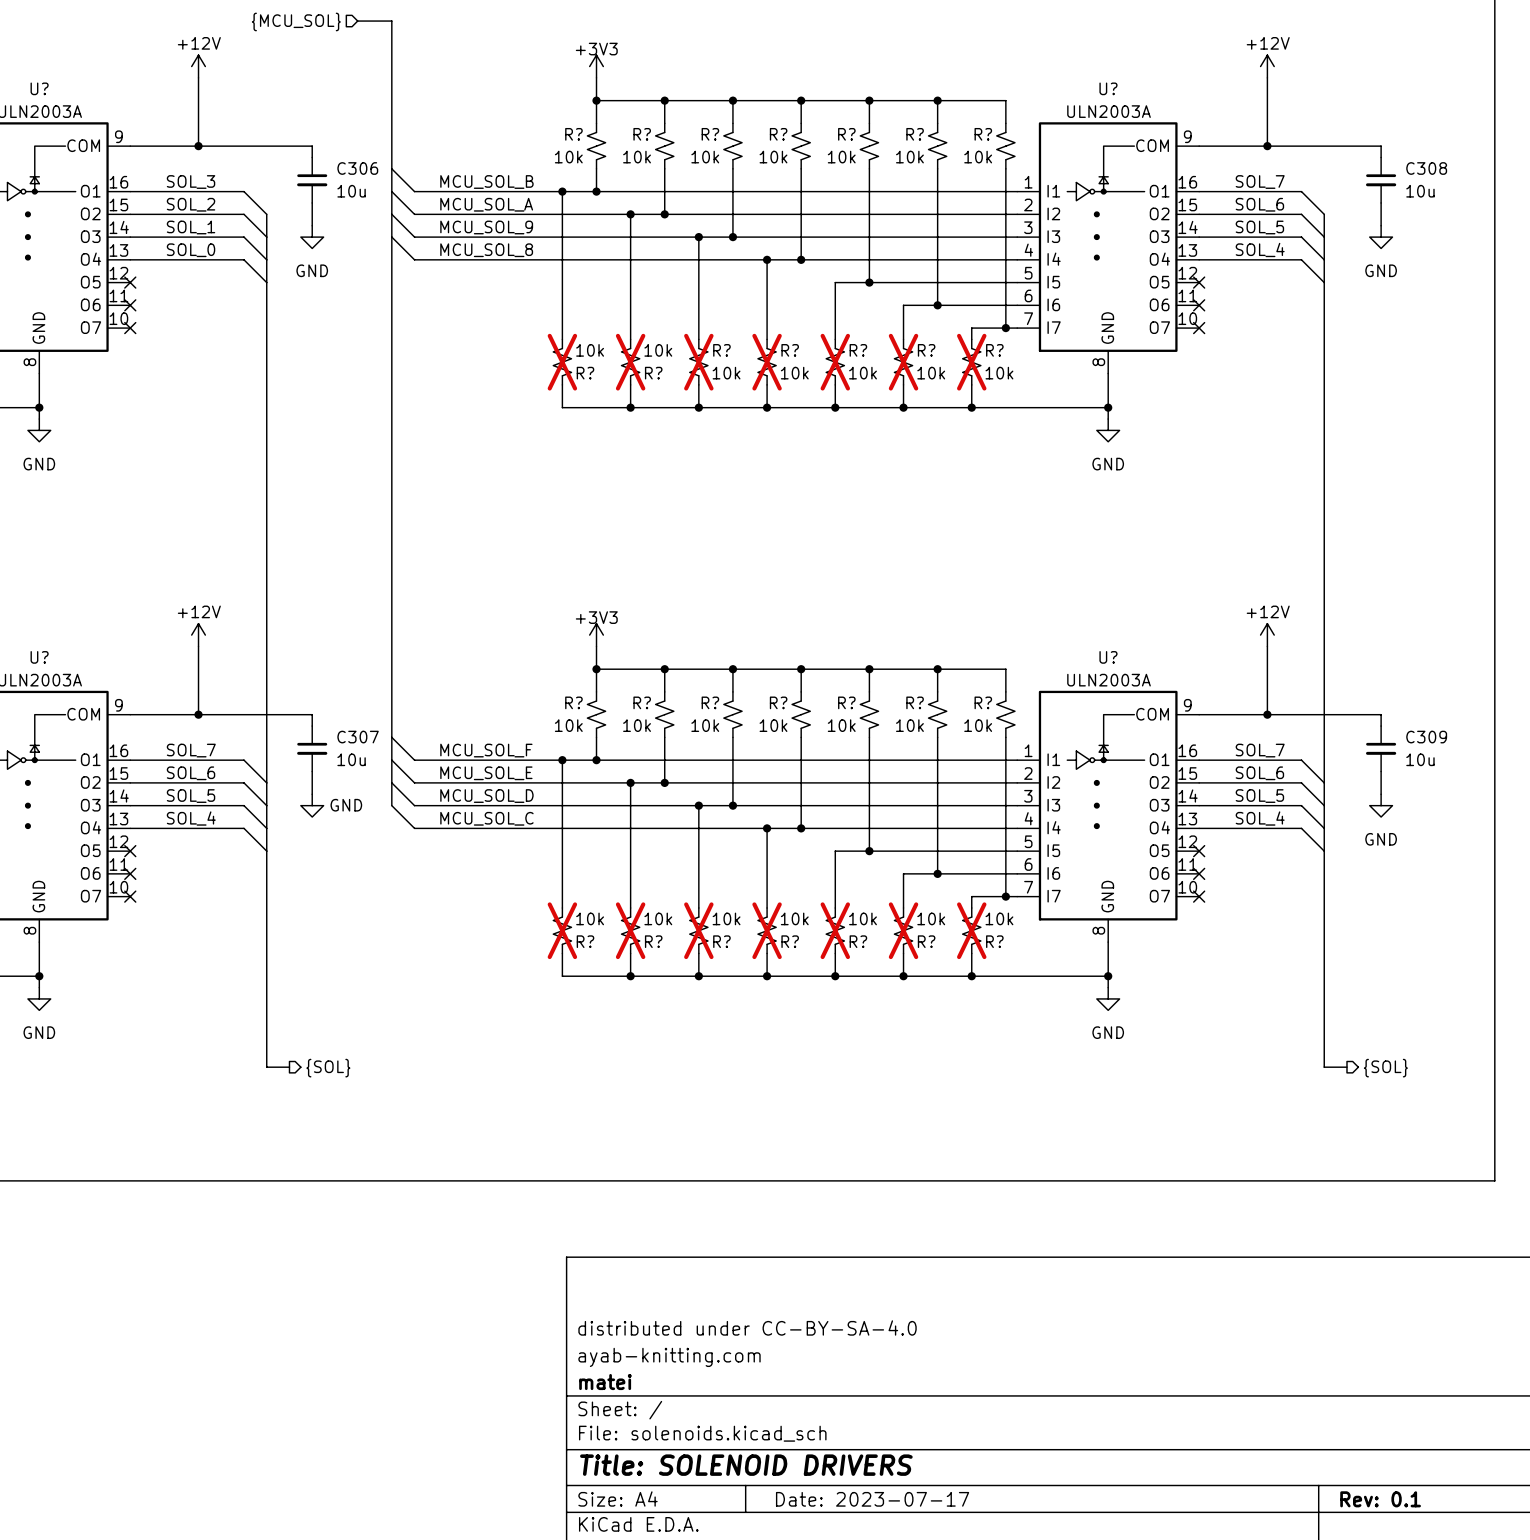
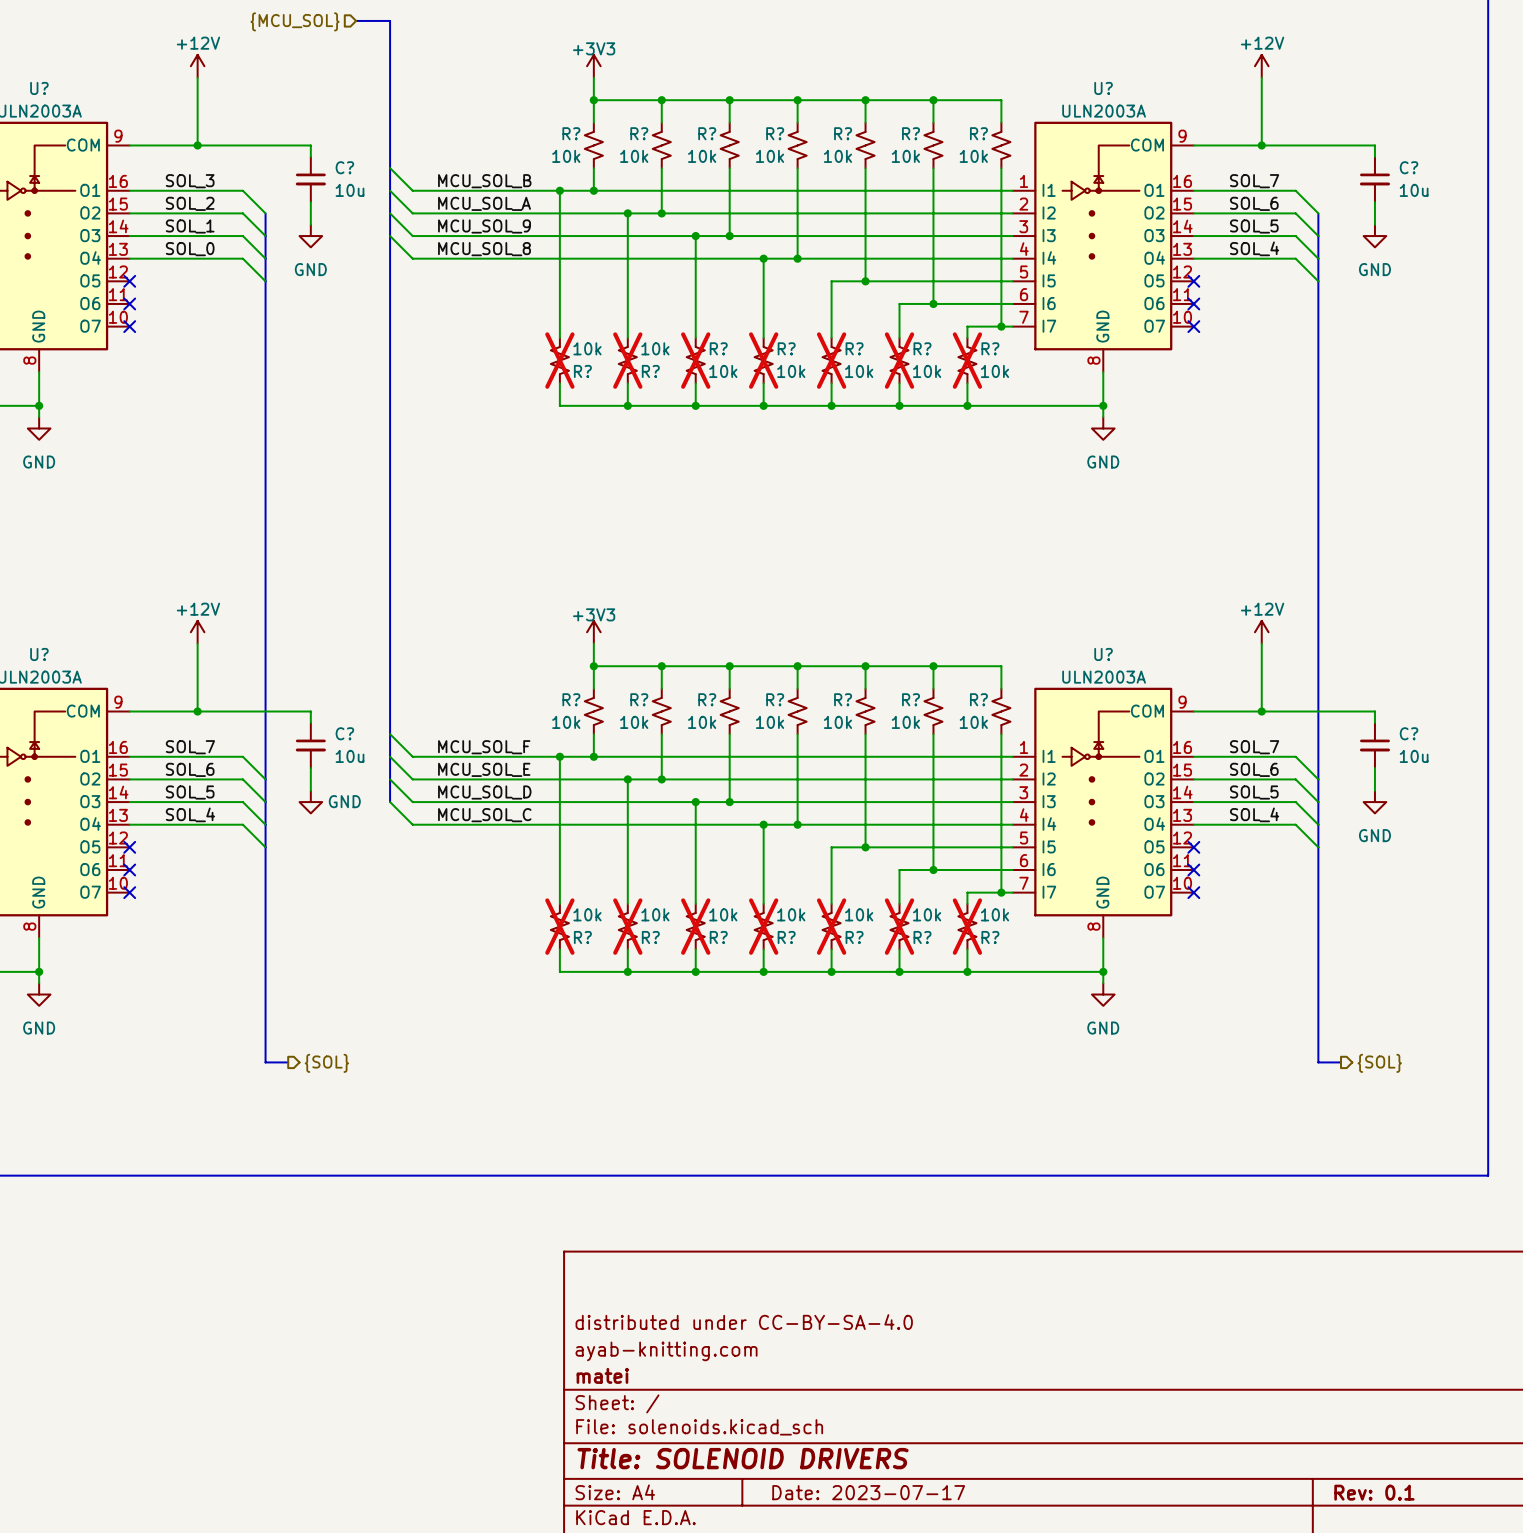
C306 name: C306 (357, 168) -> C? (344, 167)
C308 name: C308 (1426, 168) -> C? (1409, 167)
C307 name: C307 (358, 737) -> C? (344, 733)
C309 name: C309 (1426, 737) -> C? (1409, 733)

